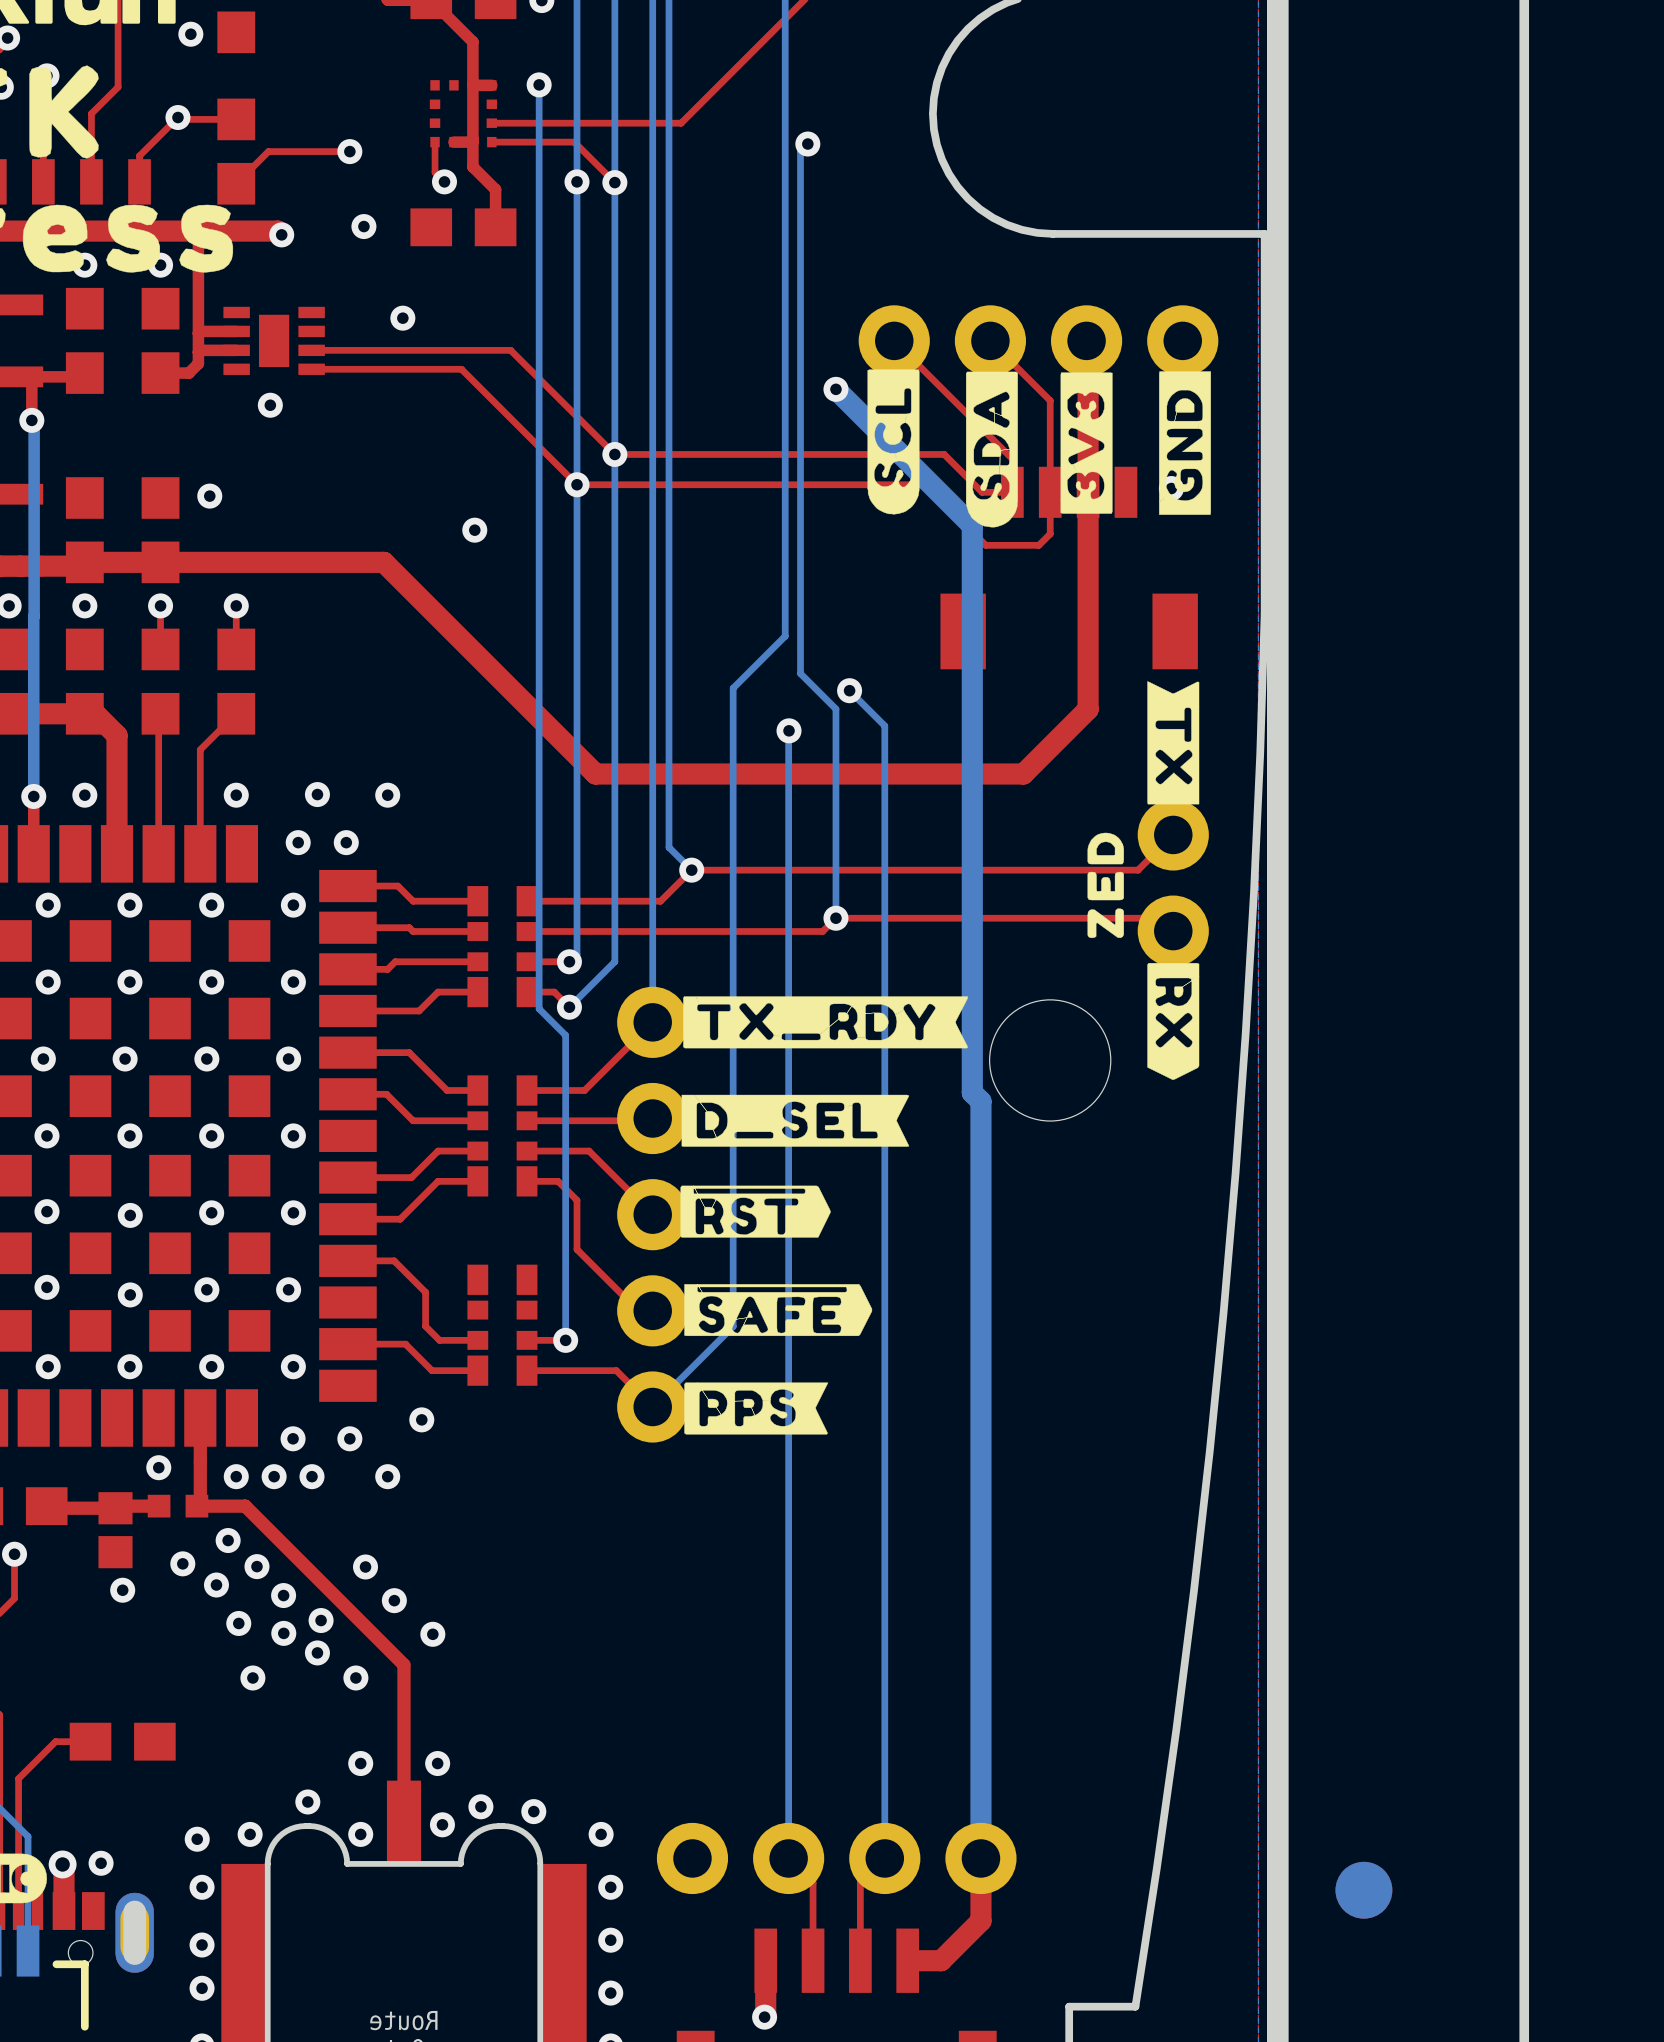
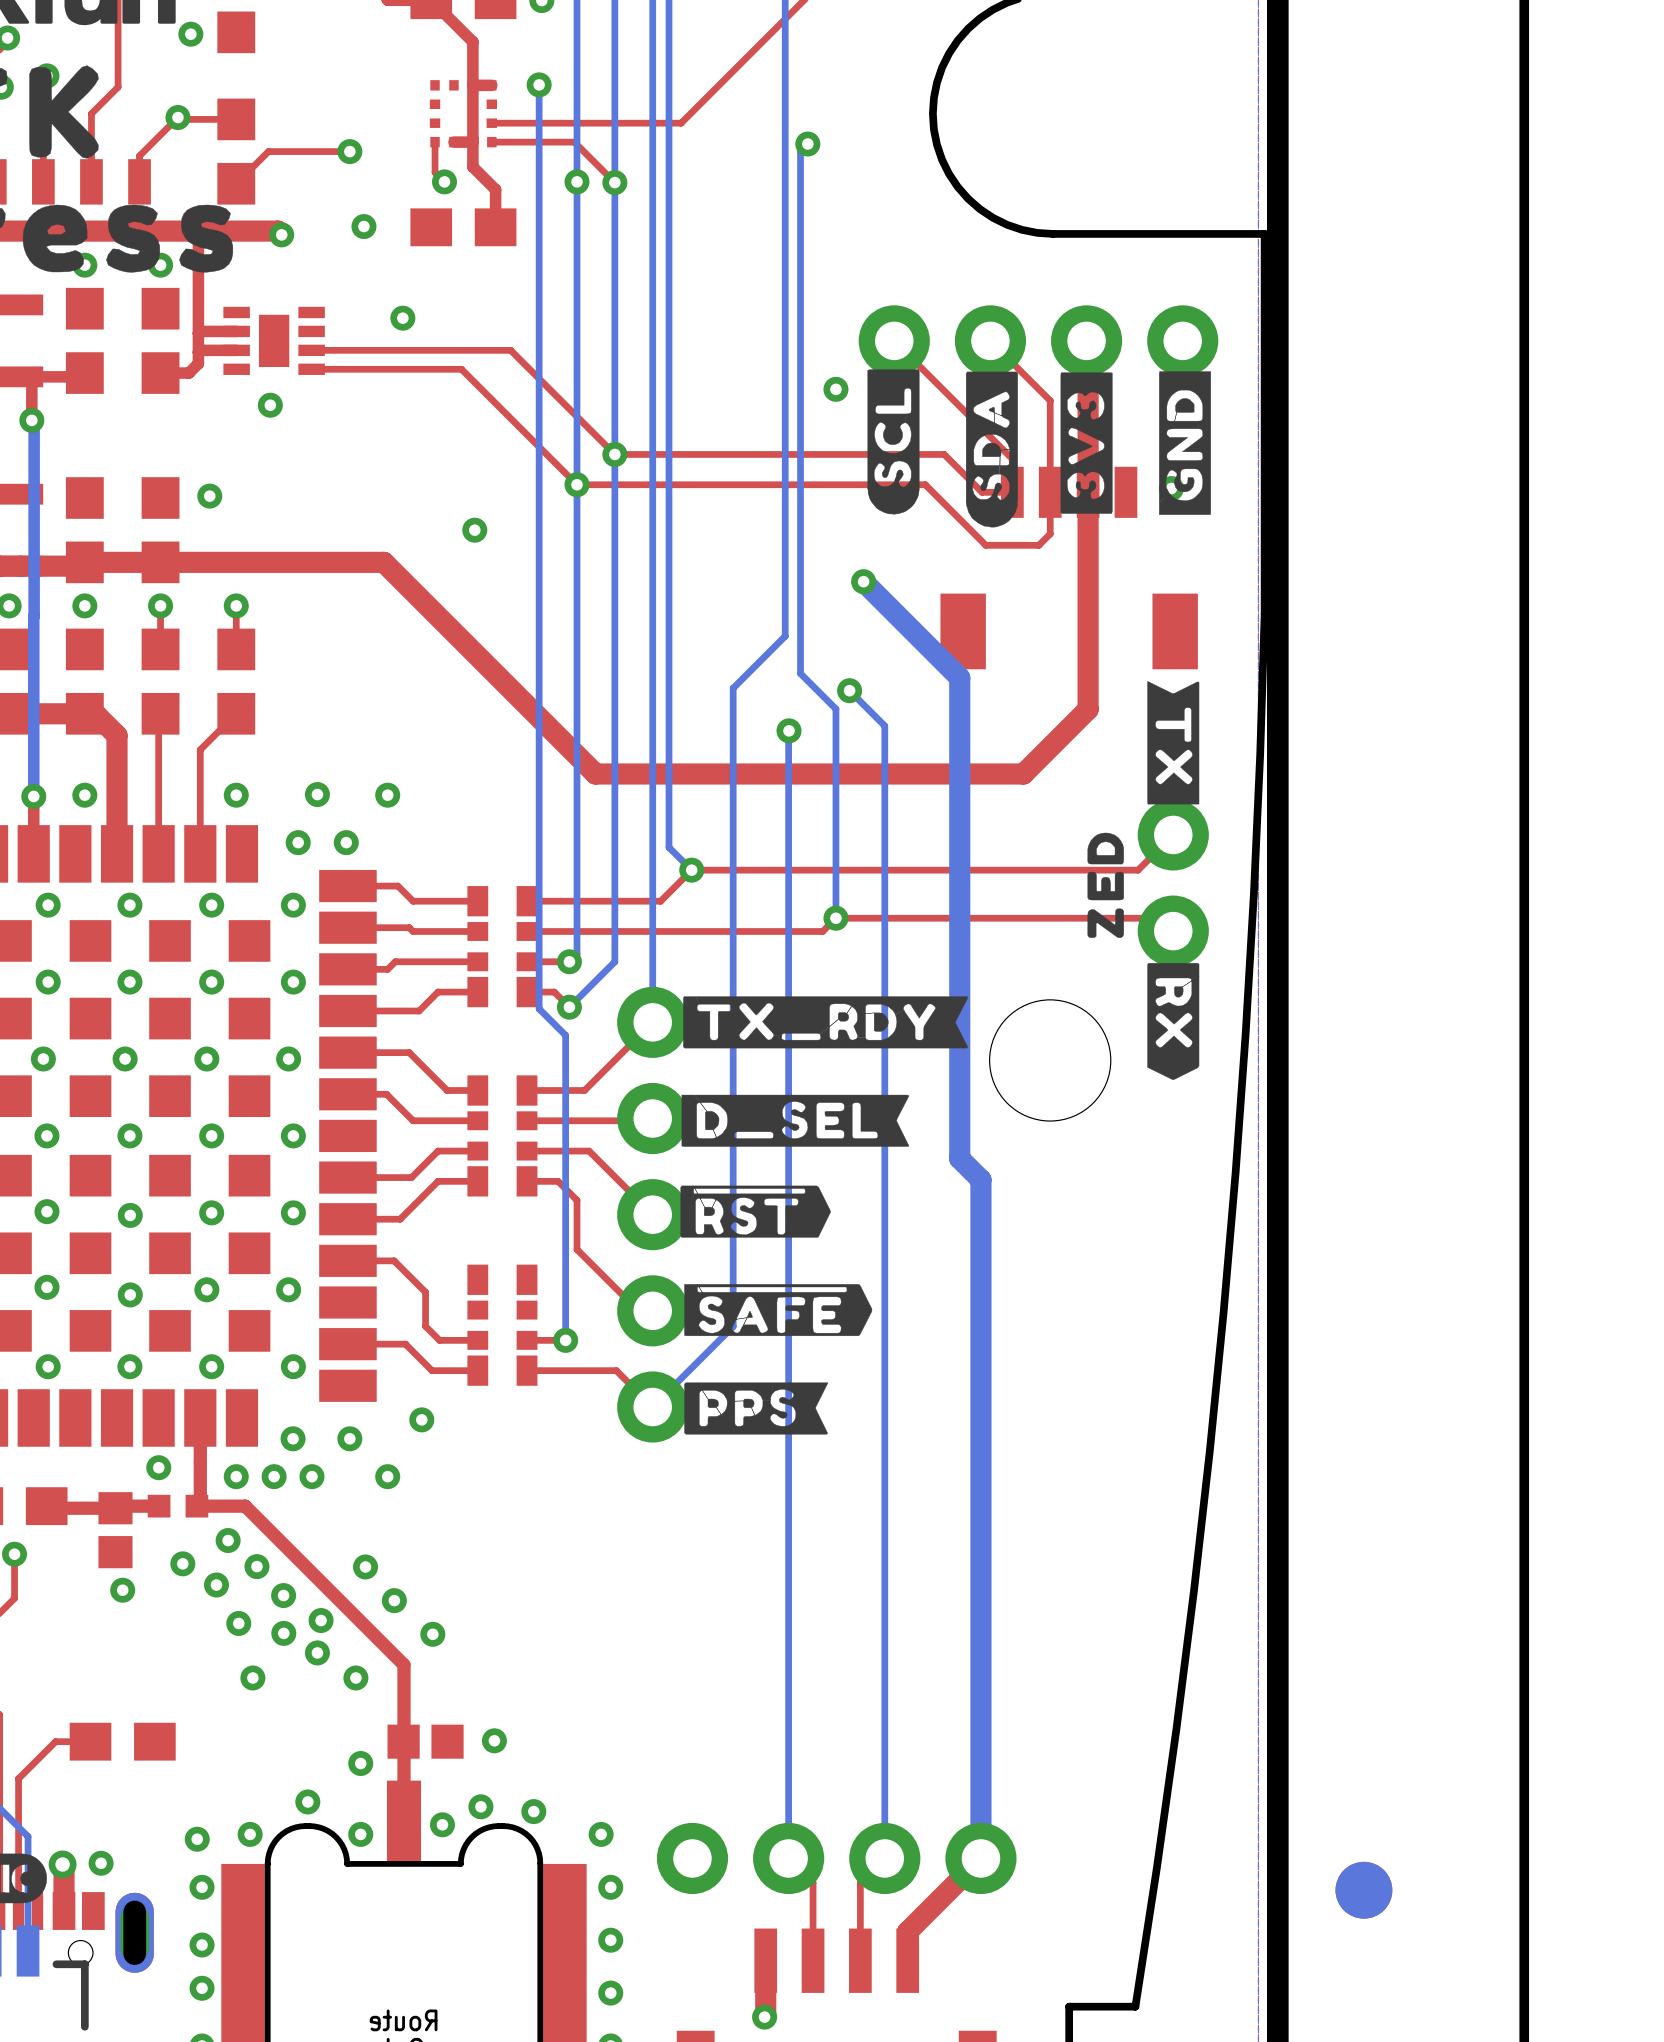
bottom track: (835, 389) (972, 525) (972, 1092) (980, 1101) (980, 1179) -> (863, 581) (959, 677) (959, 1158) (980, 1179)
via: none -> (863, 581)
part: none -> (425, 1741)
via position: (437, 1763) -> (494, 1740)
top track: (980, 1858) (980, 1920) (941, 1960) (907, 1960) -> (980, 1858) (907, 1931) (907, 1960)

